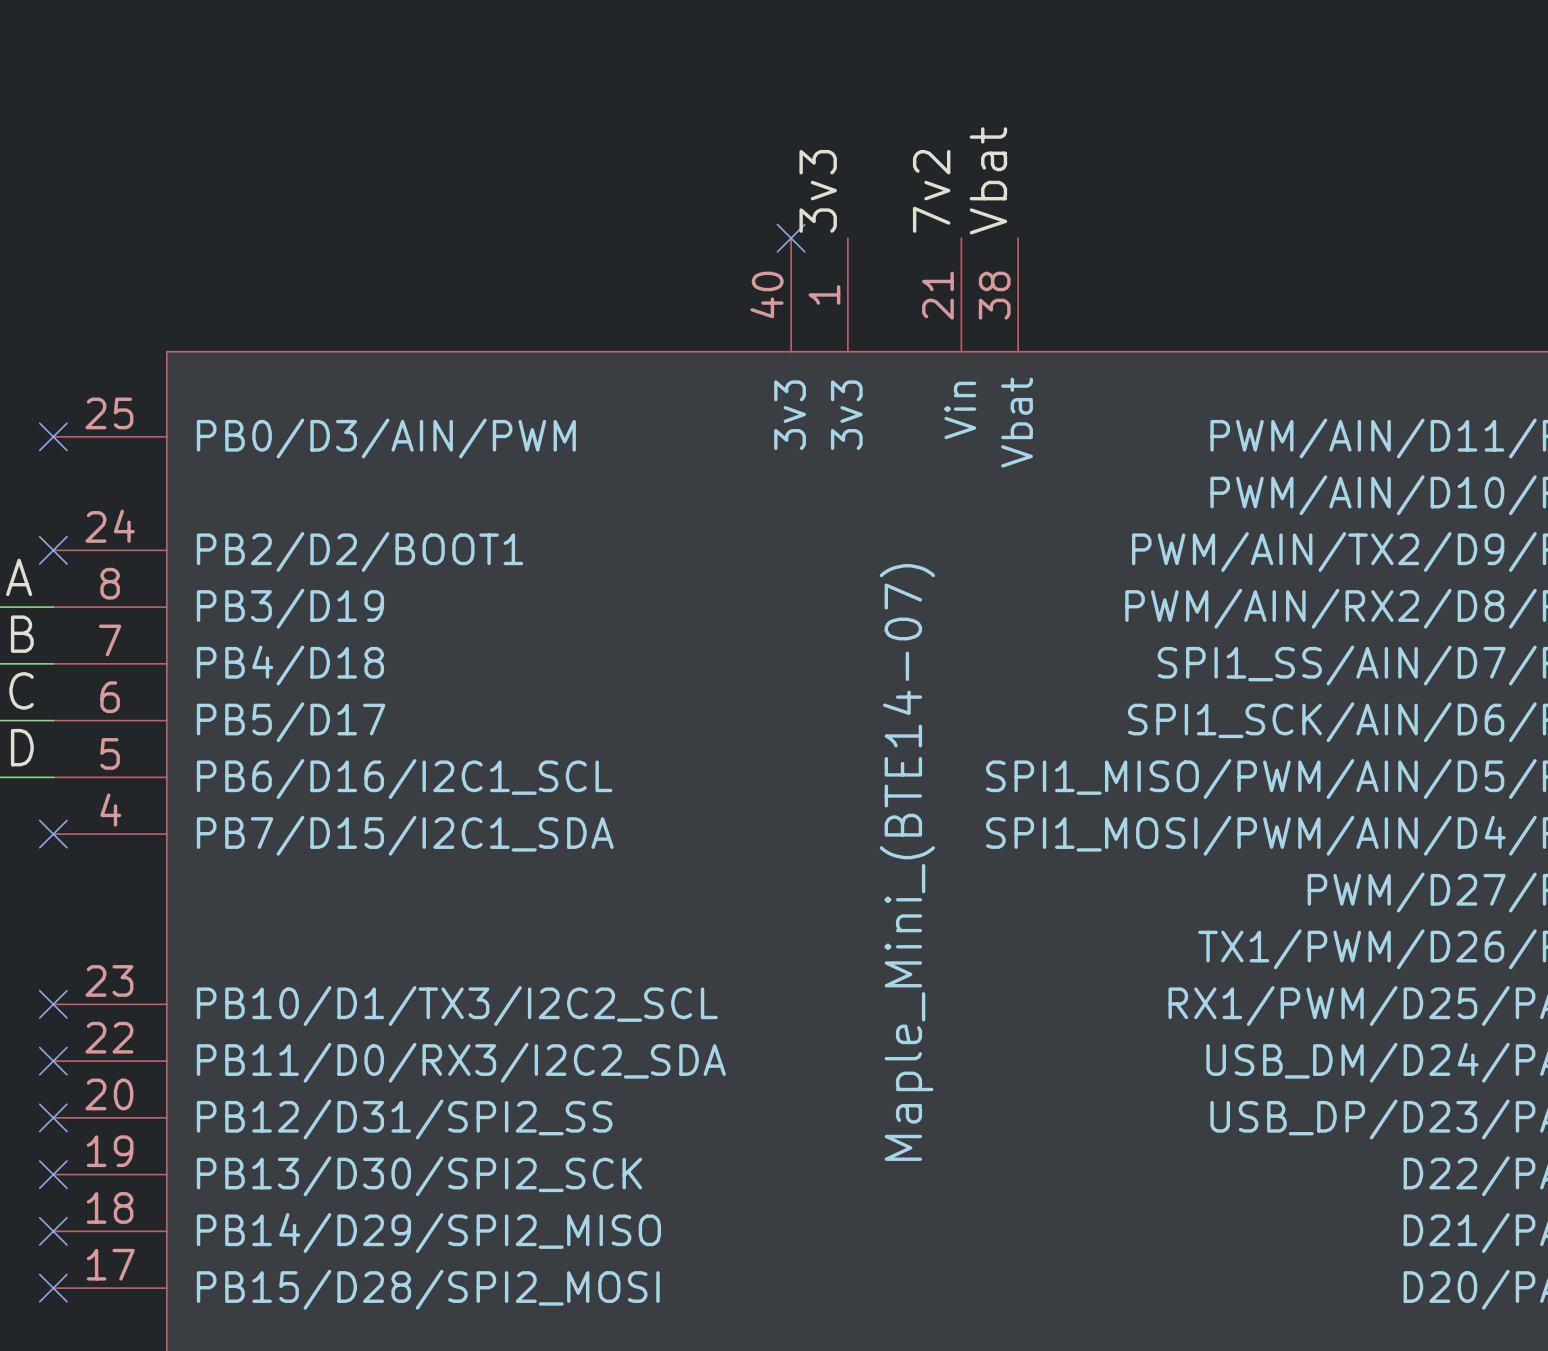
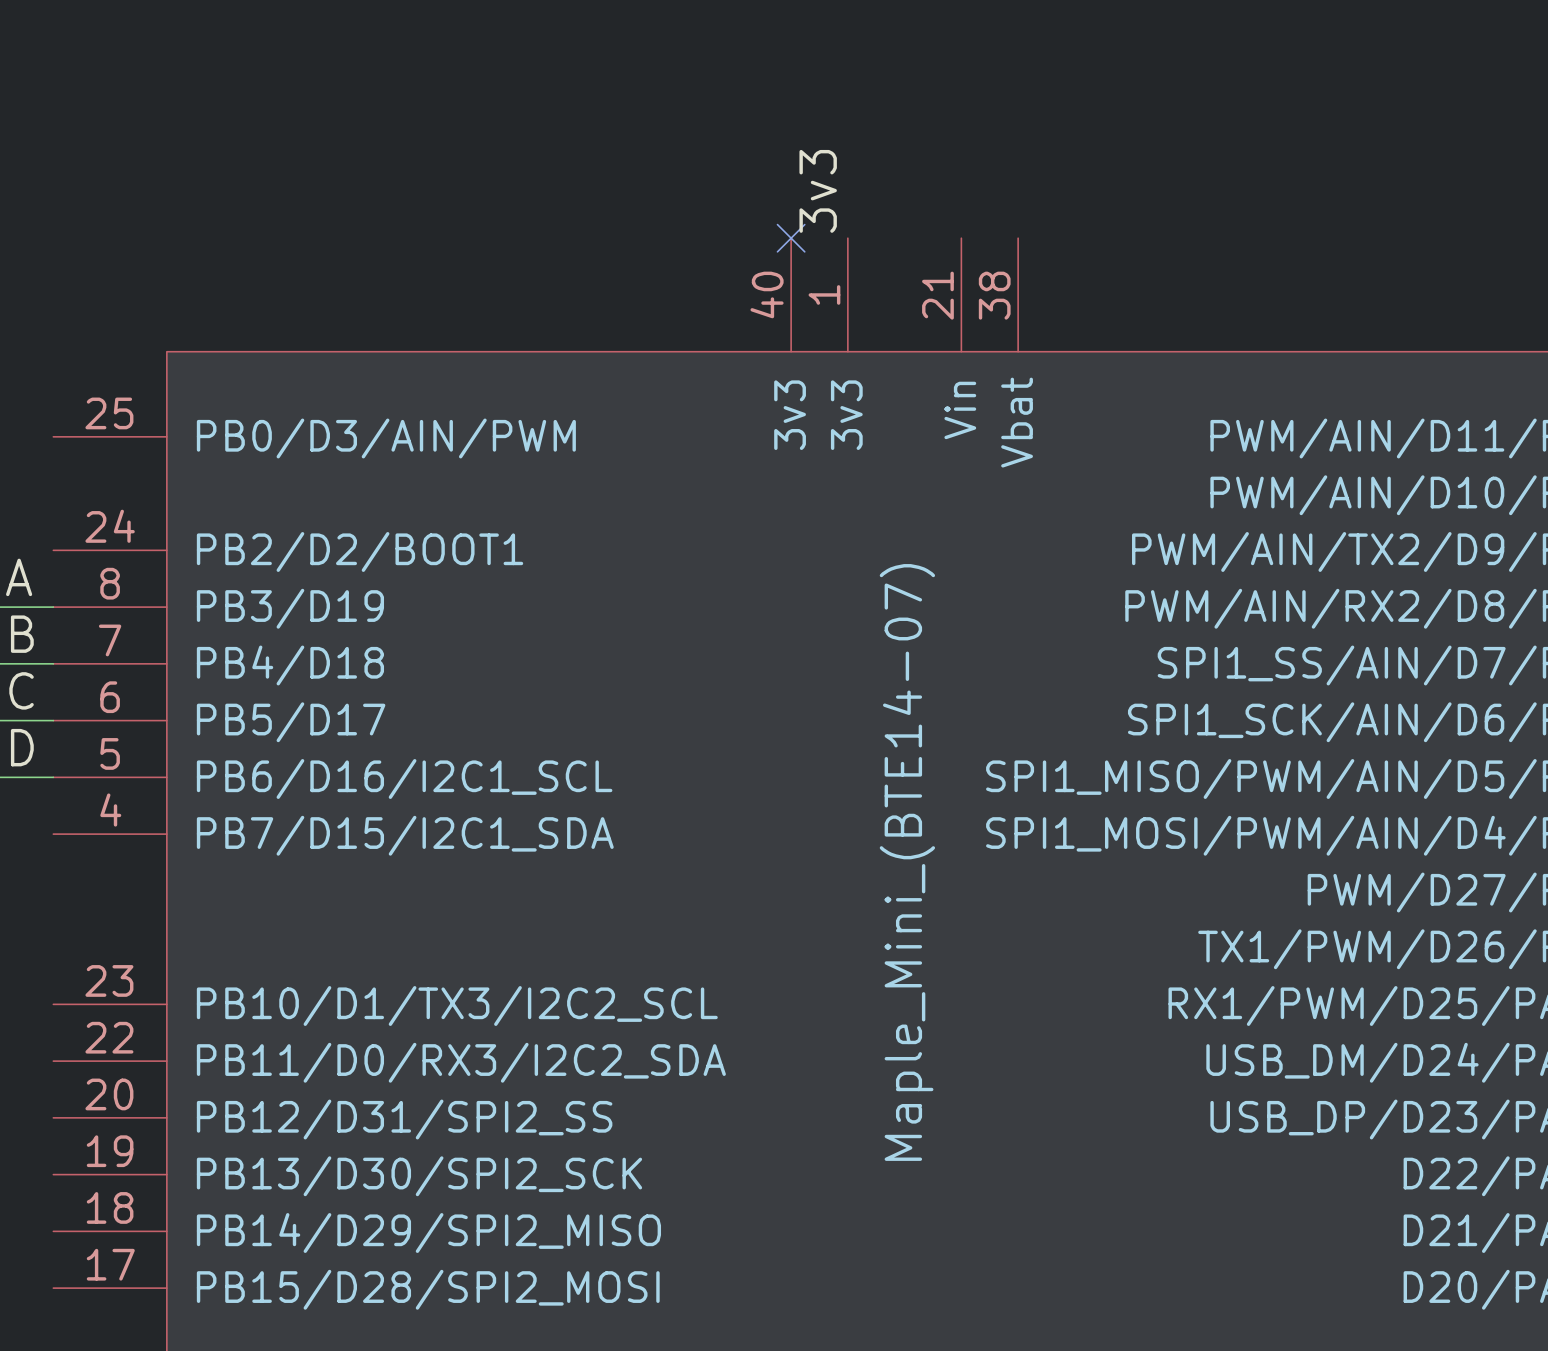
label: Vbat (988, 180) -> none
label: 7v2 (931, 191) -> none
no-connect mark: (53, 436) -> none
no-connect mark: (53, 550) -> none
no-connect mark: (53, 834) -> none
no-connect mark: (53, 1004) -> none
no-connect mark: (53, 1061) -> none
no-connect mark: (53, 1117) -> none
no-connect mark: (53, 1174) -> none
no-connect mark: (53, 1231) -> none
no-connect mark: (53, 1288) -> none

